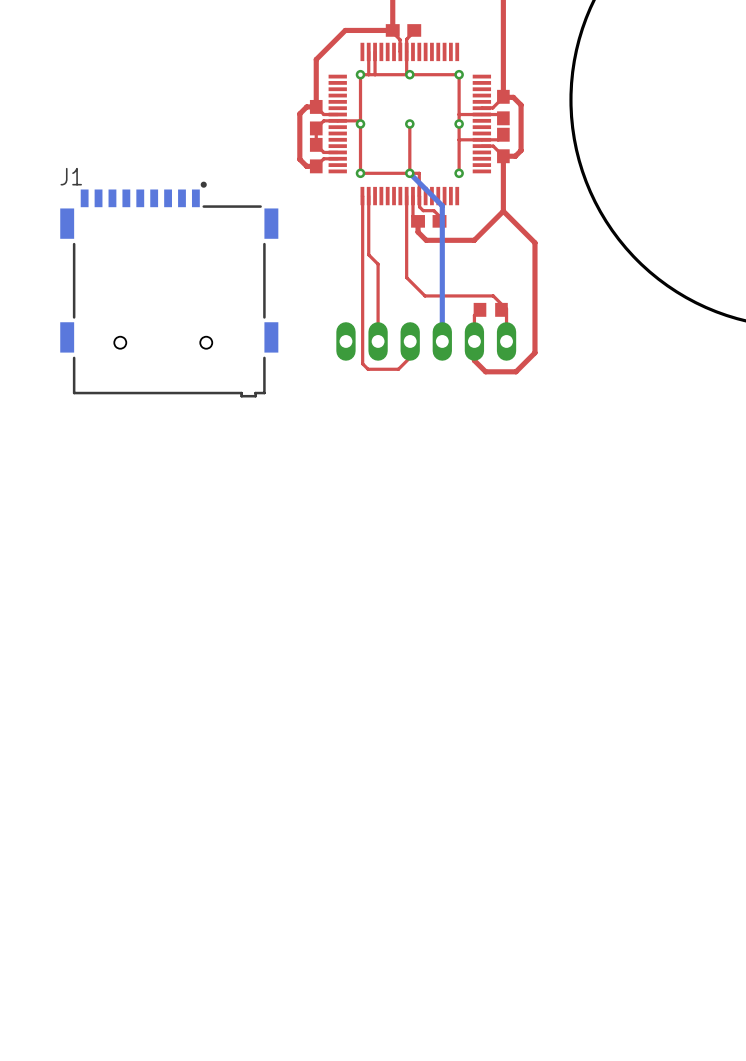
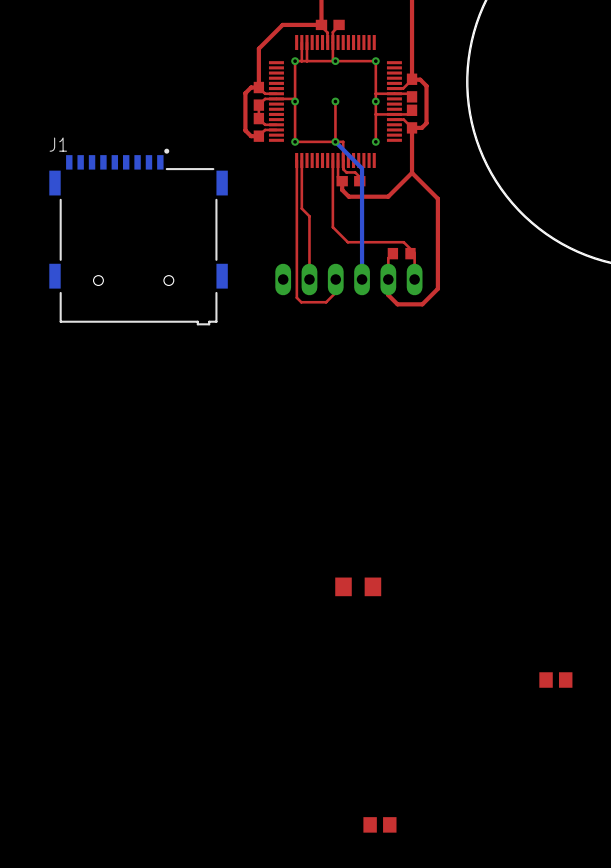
part: none -> (358, 586)
part: none -> (555, 680)
part: none -> (379, 824)

